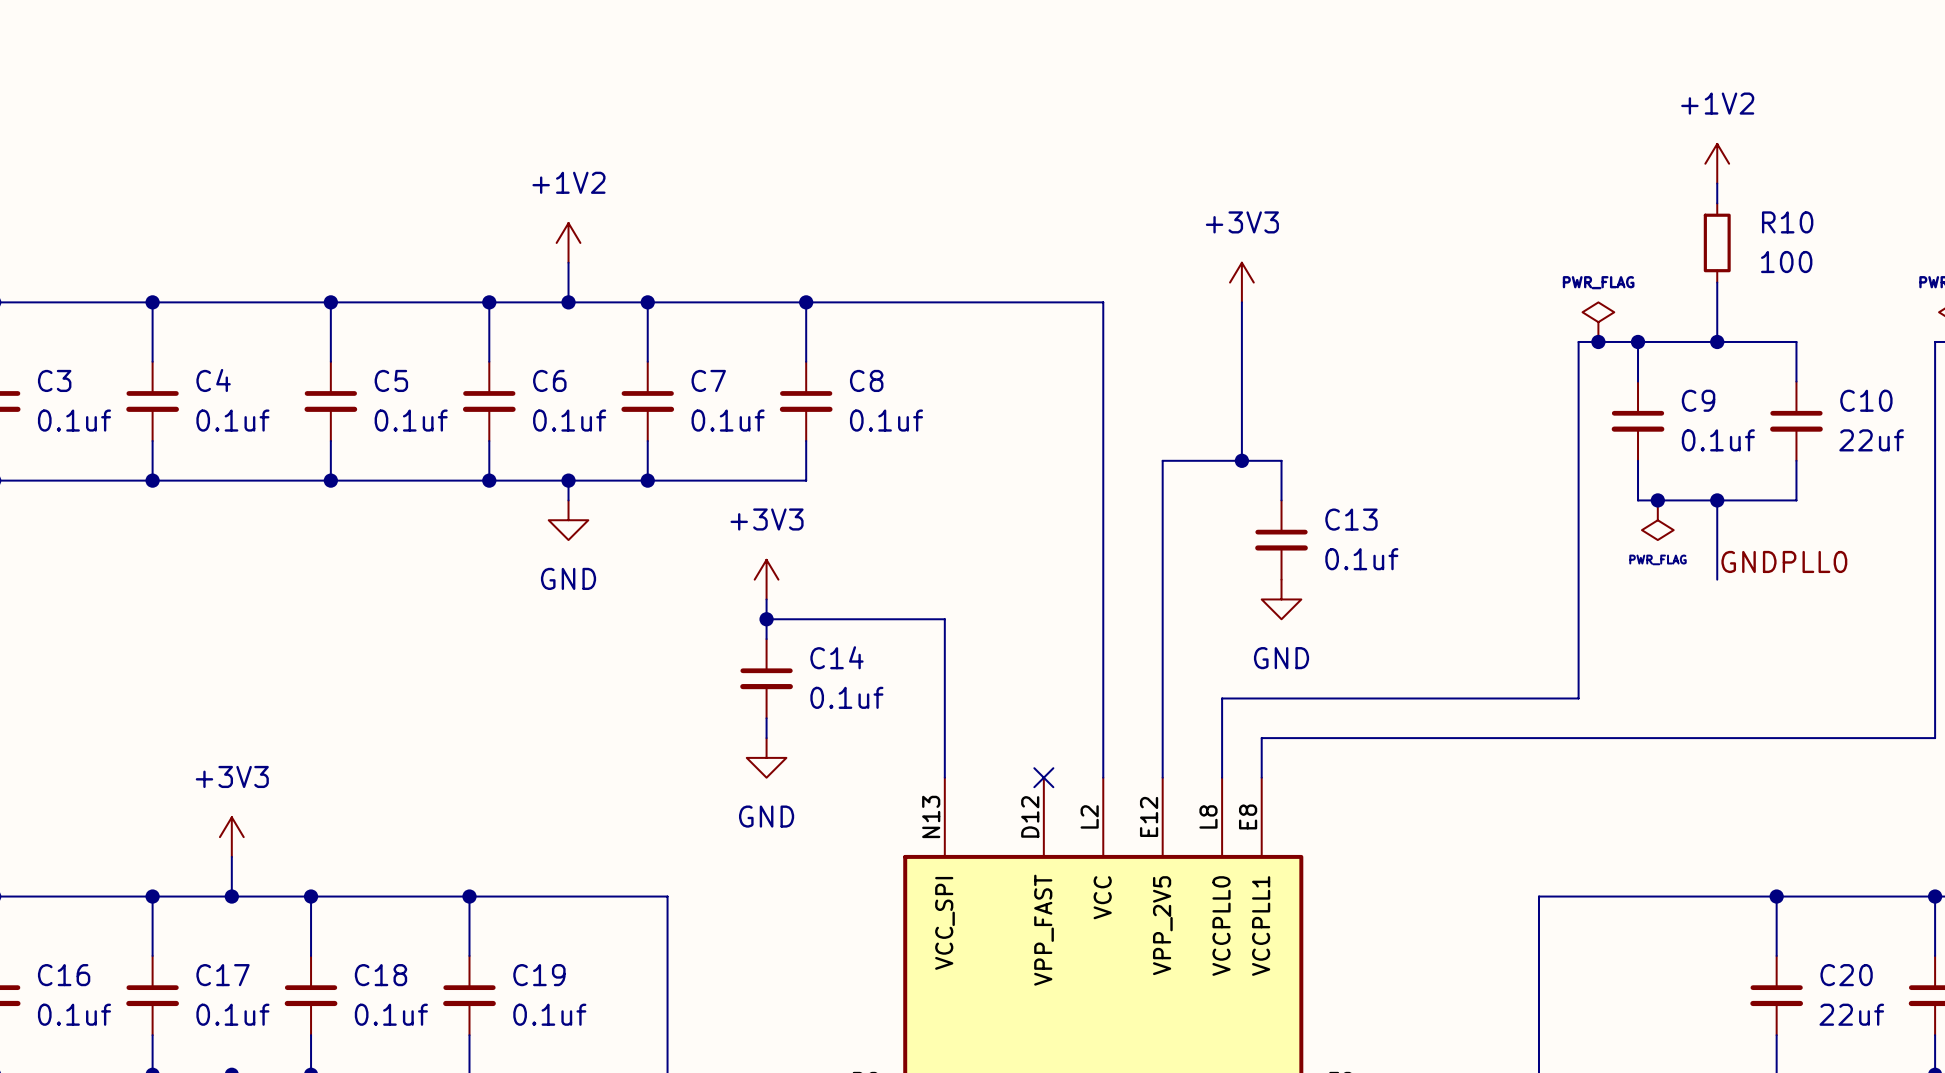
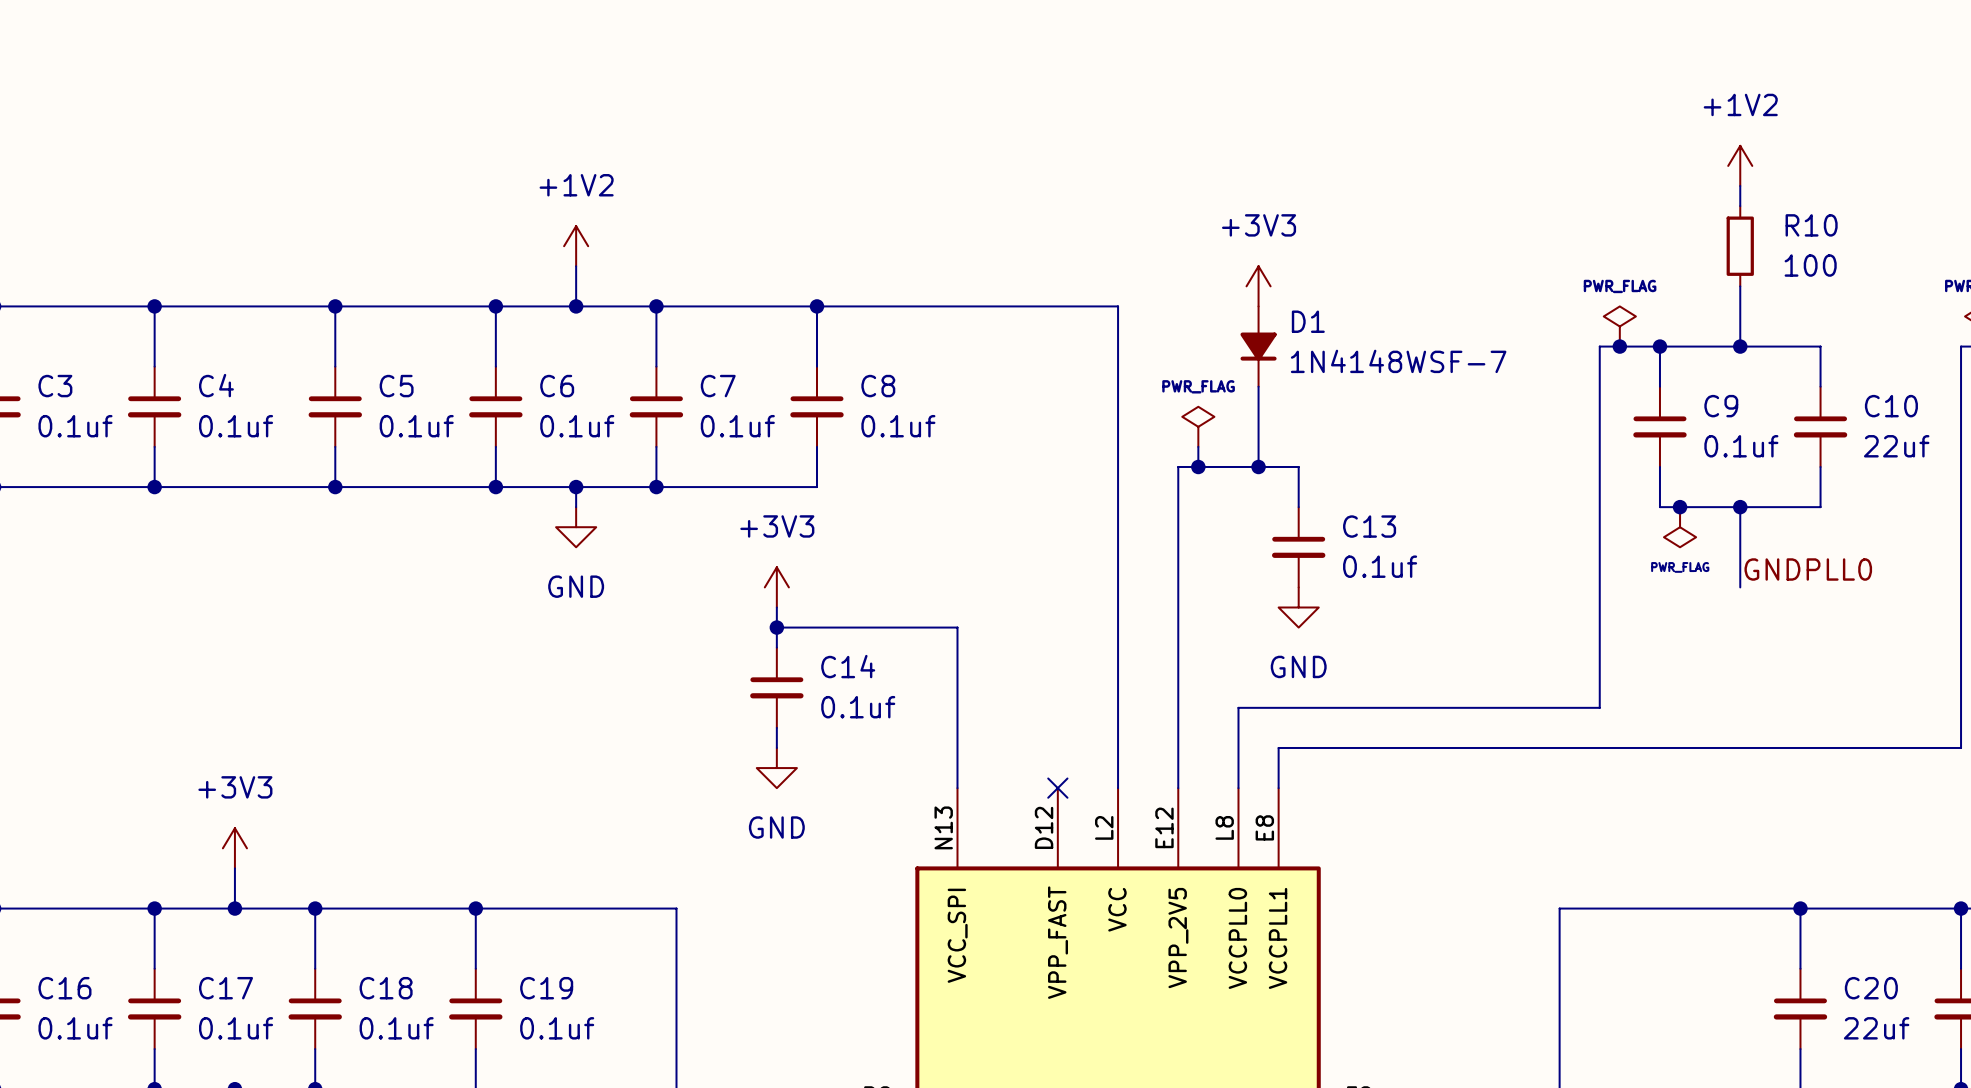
D1: none -> 1N4148WSF-7 (1258, 346)
power symbol: none -> PWR_FLAG (1198, 426)
wire: none -> (1198, 446) (1198, 466)
junction: none -> (1198, 466)

